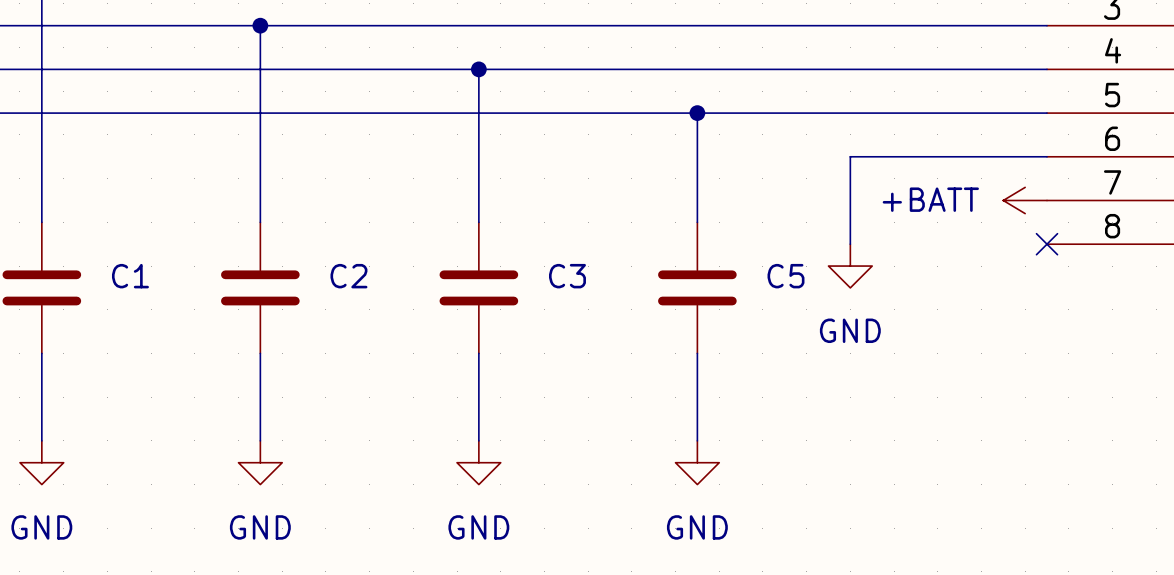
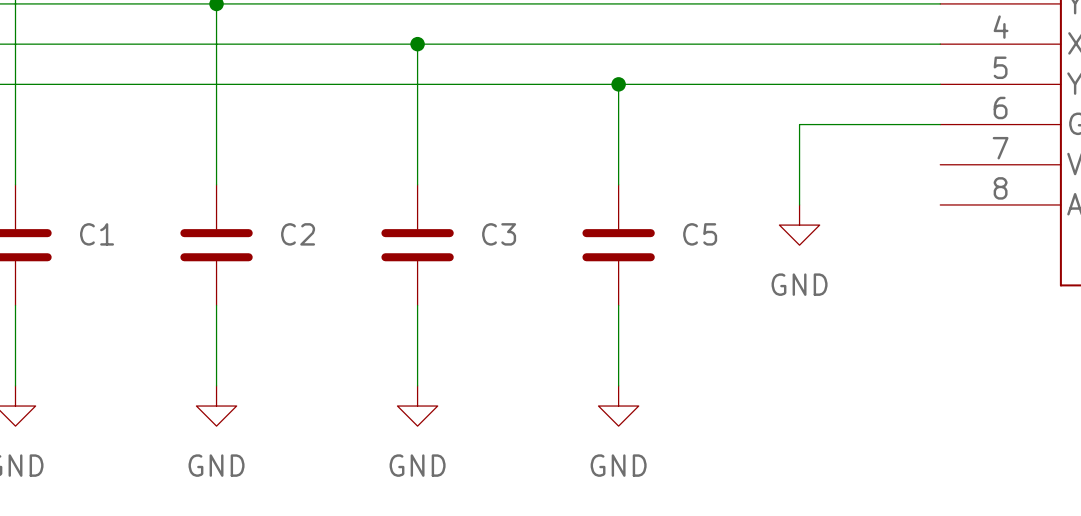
wire: (894, 156) (850, 156) (850, 244) -> (799, 124) (799, 204)
power symbol: +BATT (1025, 200) -> none
no-connect mark: (1047, 244) -> none
power symbol position: GND (850, 266) -> GND (799, 225)

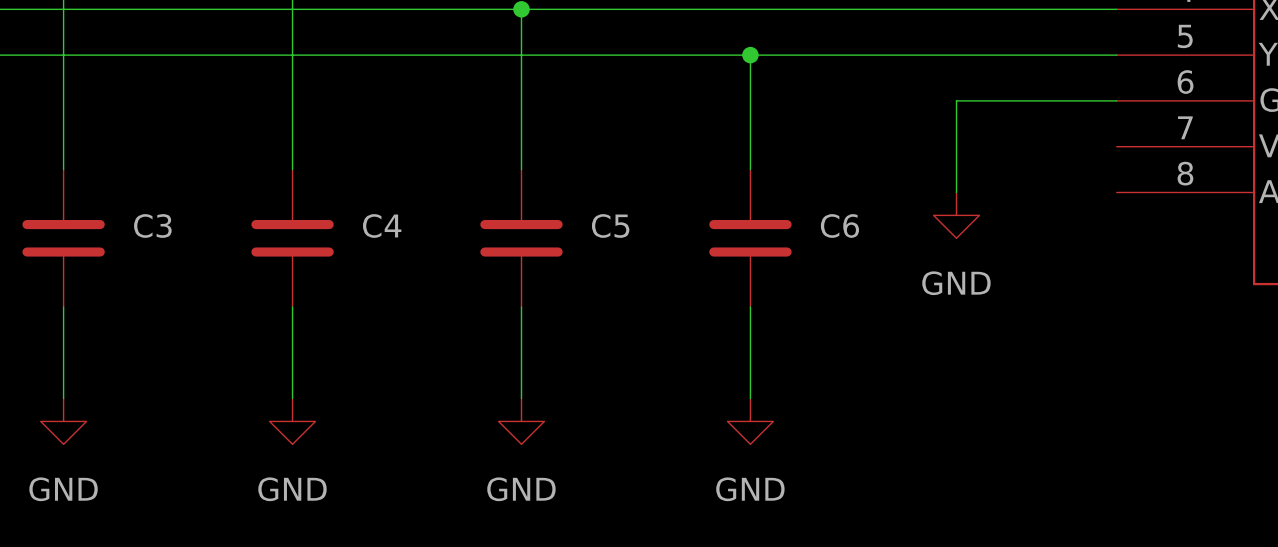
C1 name: C1 (97, 234) -> C3 (152, 225)
C2 name: C2 (298, 234) -> C4 (382, 225)
C3 name: C3 (499, 234) -> C5 (610, 225)
C5 name: C5 (700, 234) -> C6 (839, 225)

